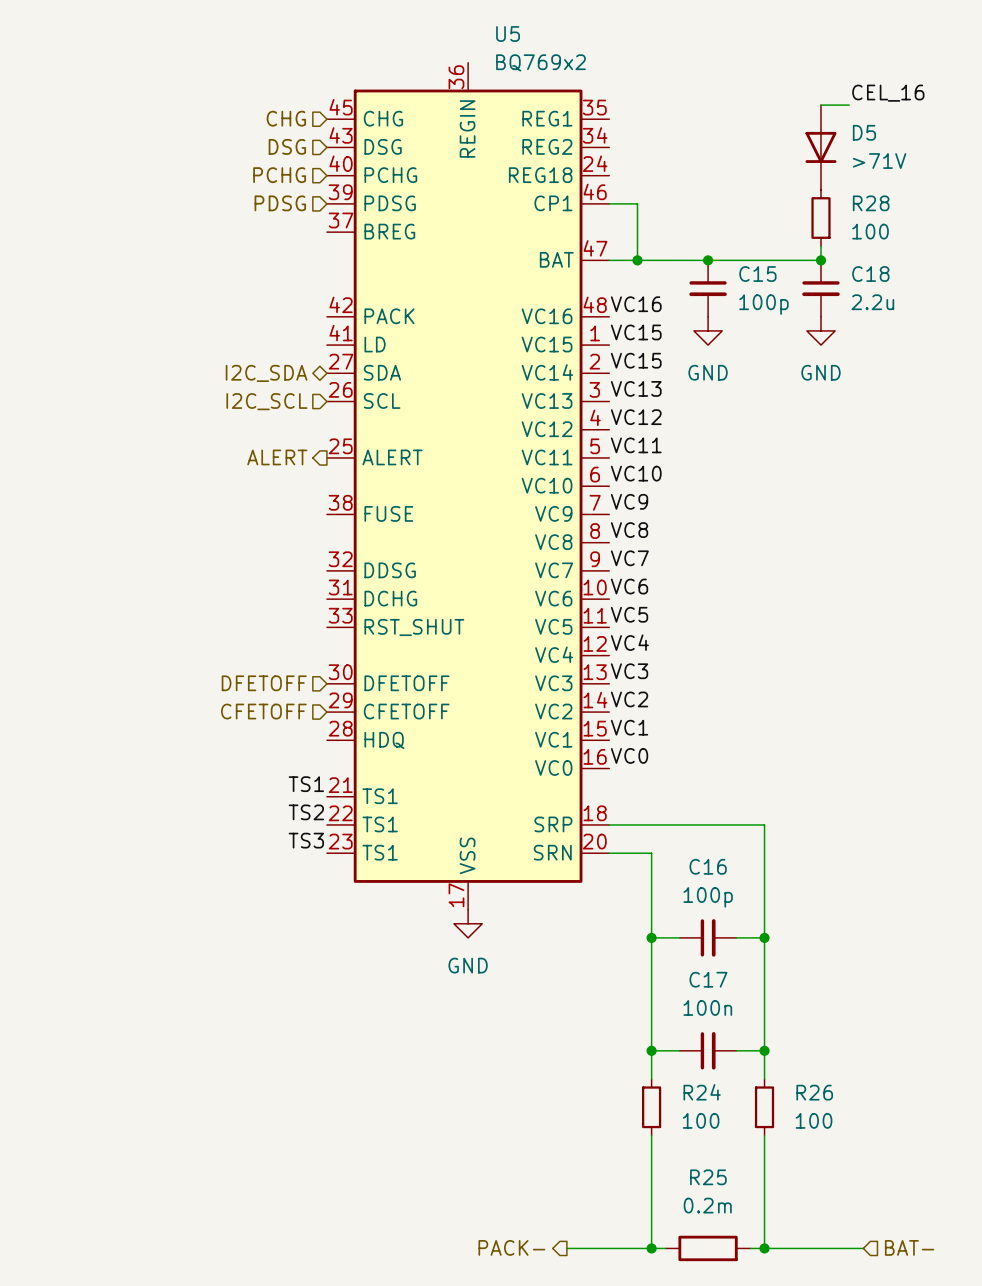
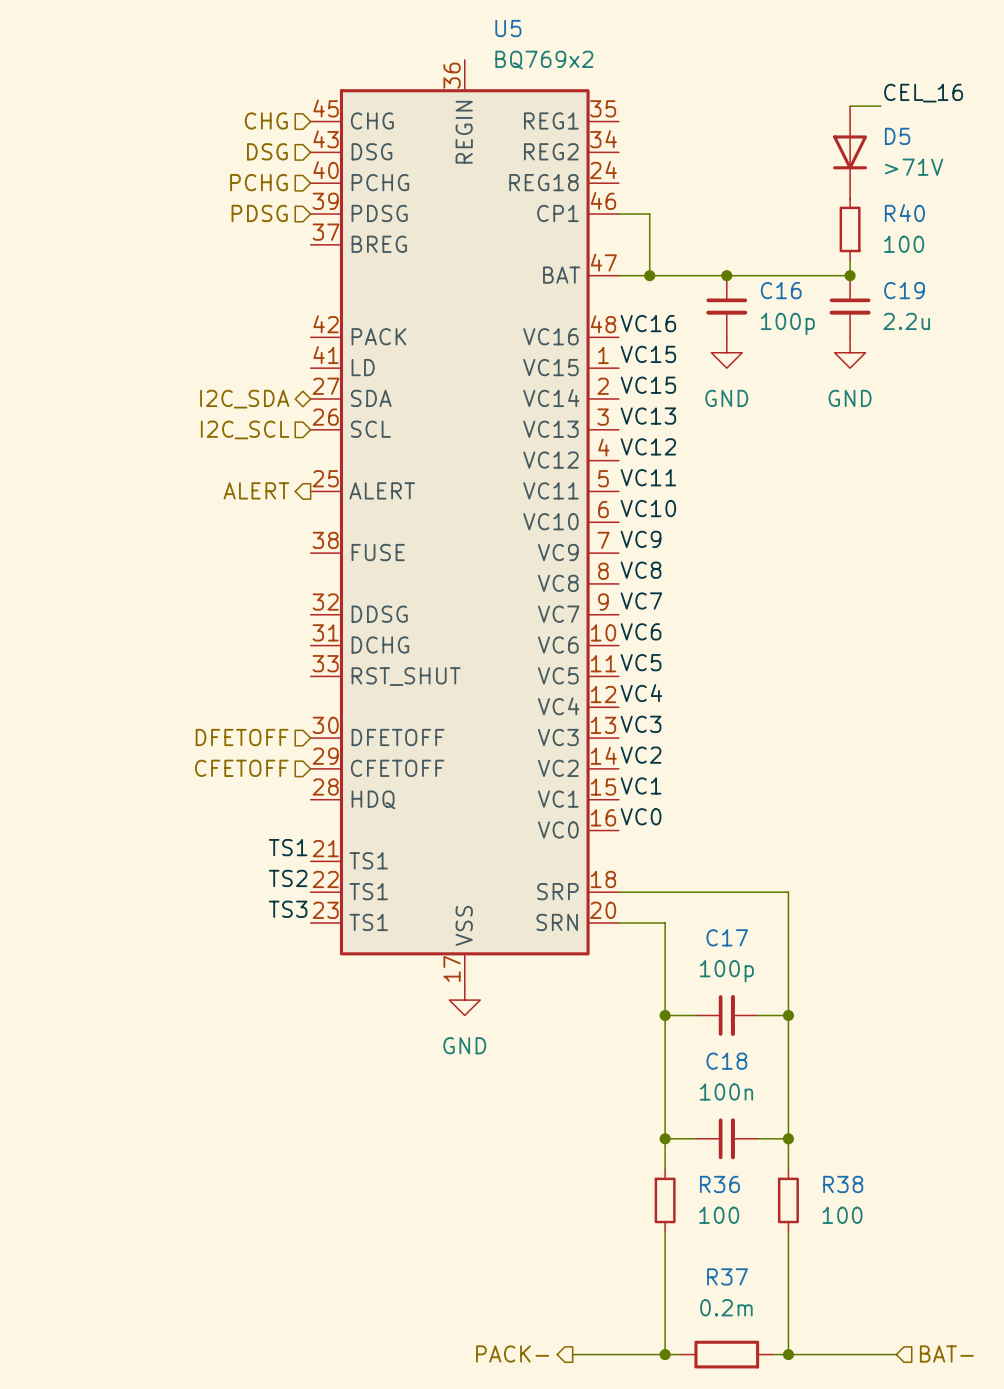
R28 name: R28 (871, 203) -> R40 (904, 213)
C15 name: C15 (757, 274) -> C16 (781, 290)
C18 name: C18 (870, 274) -> C19 (904, 290)
C16 name: C16 (708, 866) -> C17 (727, 937)
C17 name: C17 (708, 979) -> C18 (726, 1061)
R24 name: R24 (702, 1092) -> R36 (719, 1184)
R26 name: R26 (814, 1092) -> R38 (843, 1184)
R25 name: R25 (708, 1177) -> R37 (727, 1276)

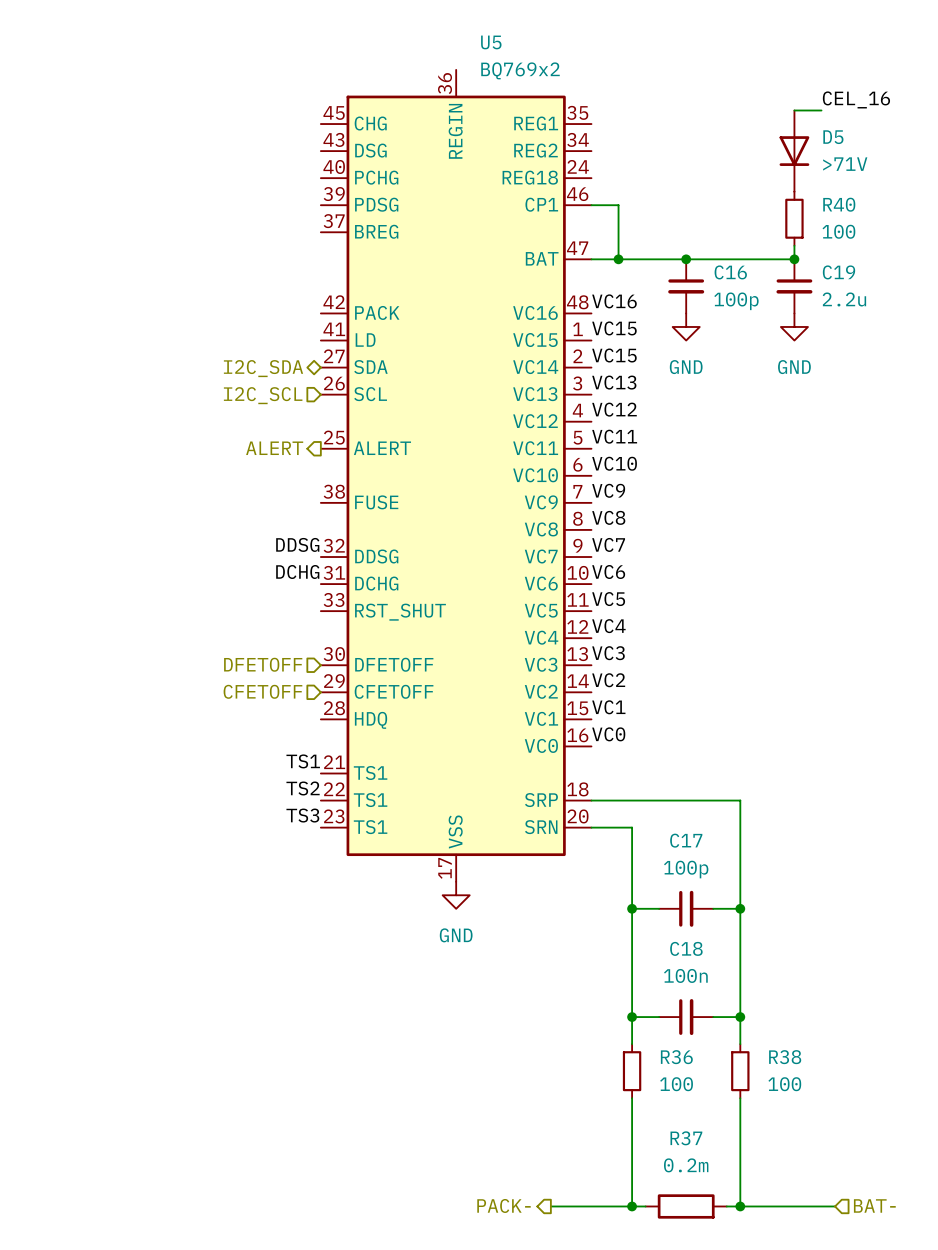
hierarchical label: CHG (266, 120) -> none
hierarchical label: DSG (267, 151) -> none
hierarchical label: PCHG (258, 182) -> none
hierarchical label: PDSG (259, 213) -> none
label: none -> DDSG (297, 544)
label: none -> DCHG (297, 571)

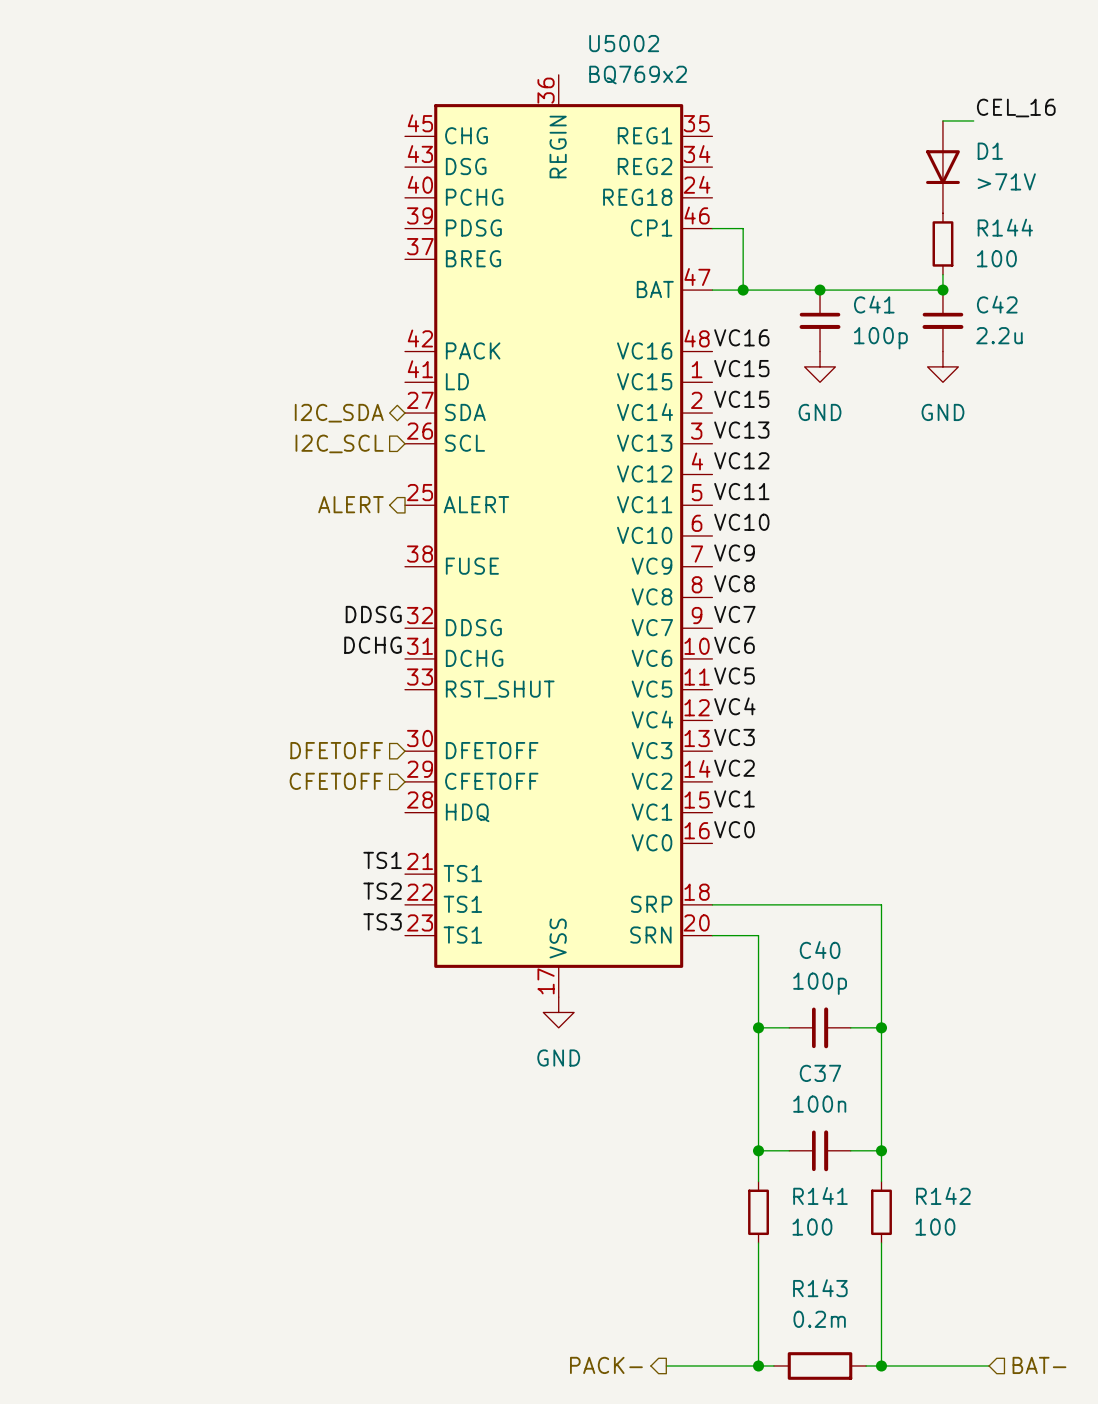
U5 name: U5 (491, 42) -> U5002 (624, 43)
D5 name: D5 (833, 137) -> D1 (990, 151)
R40 name: R40 (839, 204) -> R144 (1005, 227)
C16 name: C16 (730, 272) -> C41 (874, 304)
C19 name: C19 (839, 272) -> C42 (997, 304)
C17 name: C17 (686, 840) -> C40 (820, 950)
C18 name: C18 (686, 948) -> C37 (820, 1073)
R36 name: R36 (676, 1057) -> R141 (820, 1195)
R38 name: R38 (785, 1057) -> R142 (943, 1195)
R37 name: R37 (686, 1138) -> R143 (820, 1288)

